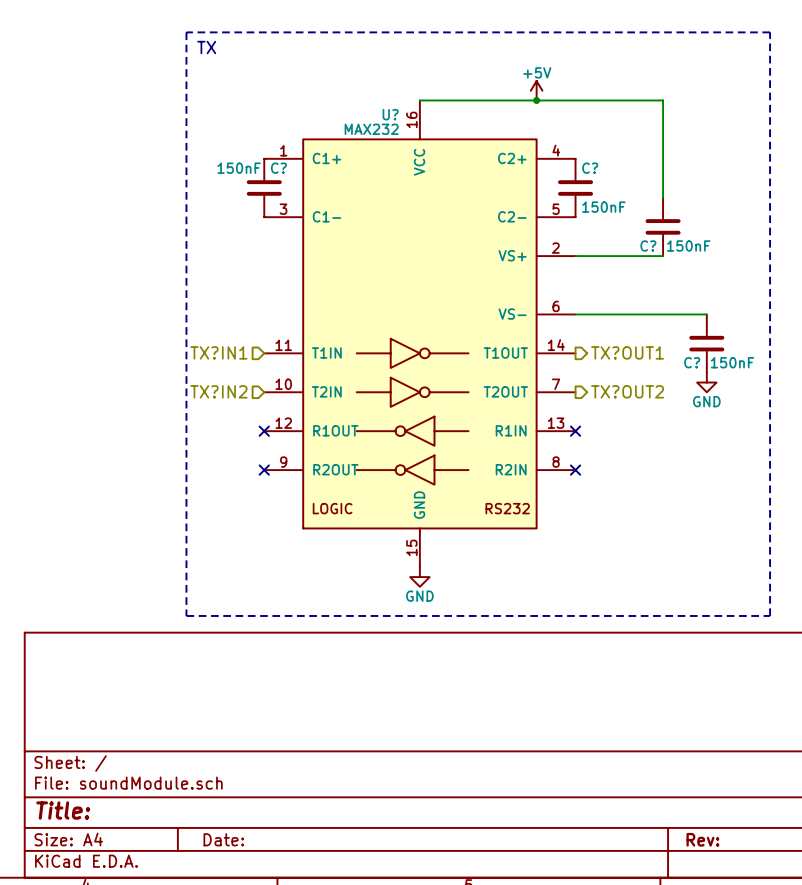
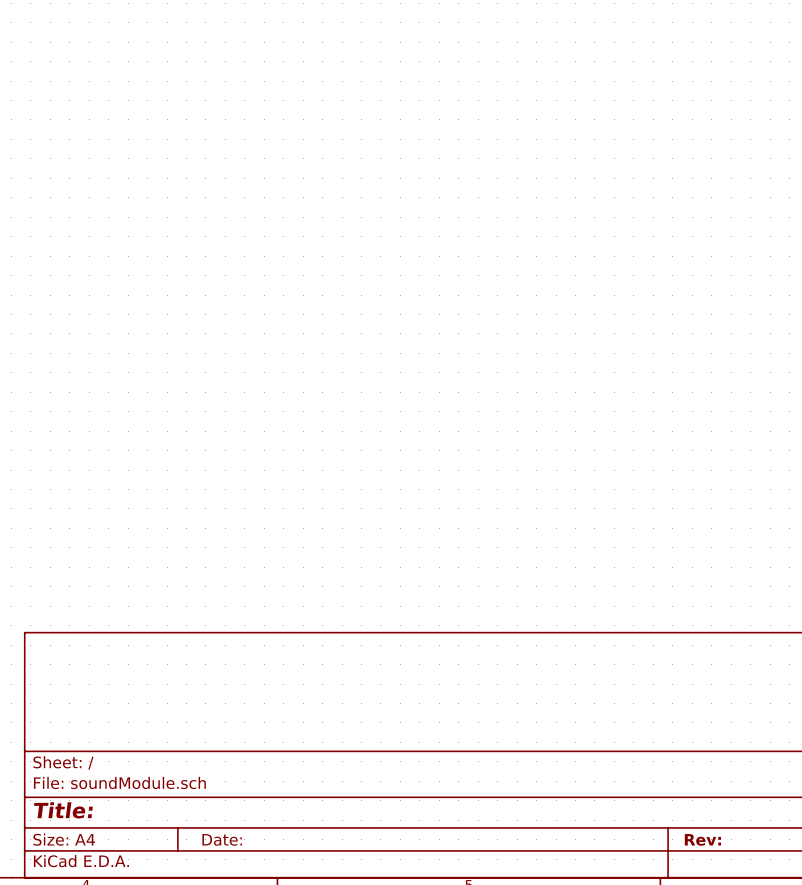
line: (186, 32) (770, 32) (770, 615) (186, 615) (186, 32) -> none
text: TX (206, 47) -> none
power symbol: +5V (536, 90) -> none
wire: (419, 100) (663, 100) (663, 197) -> none
junction: (536, 100) -> none
C?: 150nF (264, 188) -> none
C?: 150nF (575, 188) -> none
C?: 150nF (663, 226) -> none
wire: (575, 256) (663, 256) -> none
wire: (575, 314) (706, 314) -> none
U?: MAX232 (419, 333) -> none
C?: 150nF (706, 343) -> none
hierarchical label: TX?IN1 (218, 352) -> none
hierarchical label: TX?OUT1 (627, 352) -> none
power symbol: GND (706, 382) -> none
hierarchical label: TX?IN2 (218, 391) -> none
hierarchical label: TX?OUT2 (627, 391) -> none
no-connect mark: (264, 431) -> none
no-connect mark: (575, 431) -> none
no-connect mark: (264, 470) -> none
no-connect mark: (575, 470) -> none
power symbol: GND (419, 577) -> none

